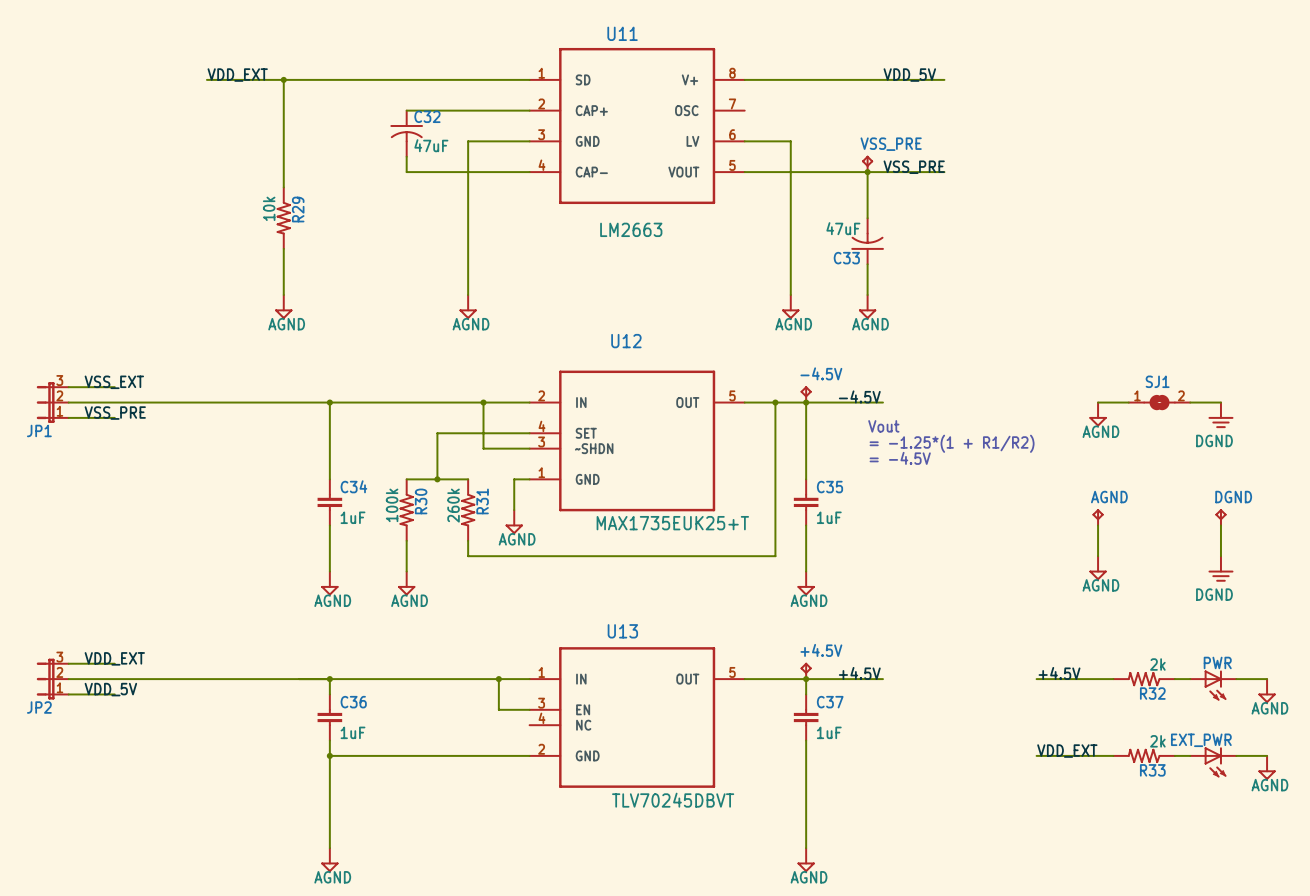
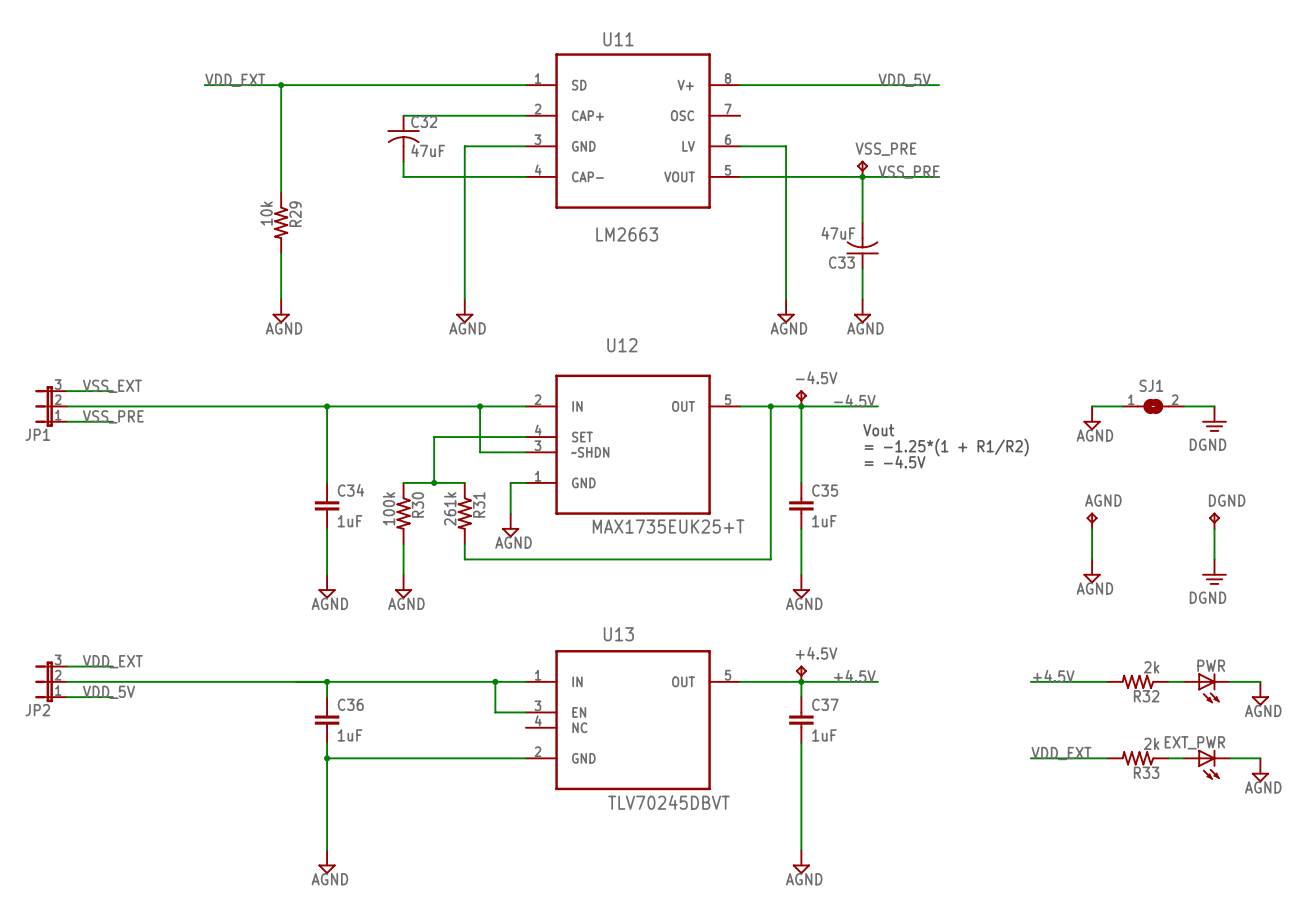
R31 value: 260k (453, 505) -> 261k (450, 509)

